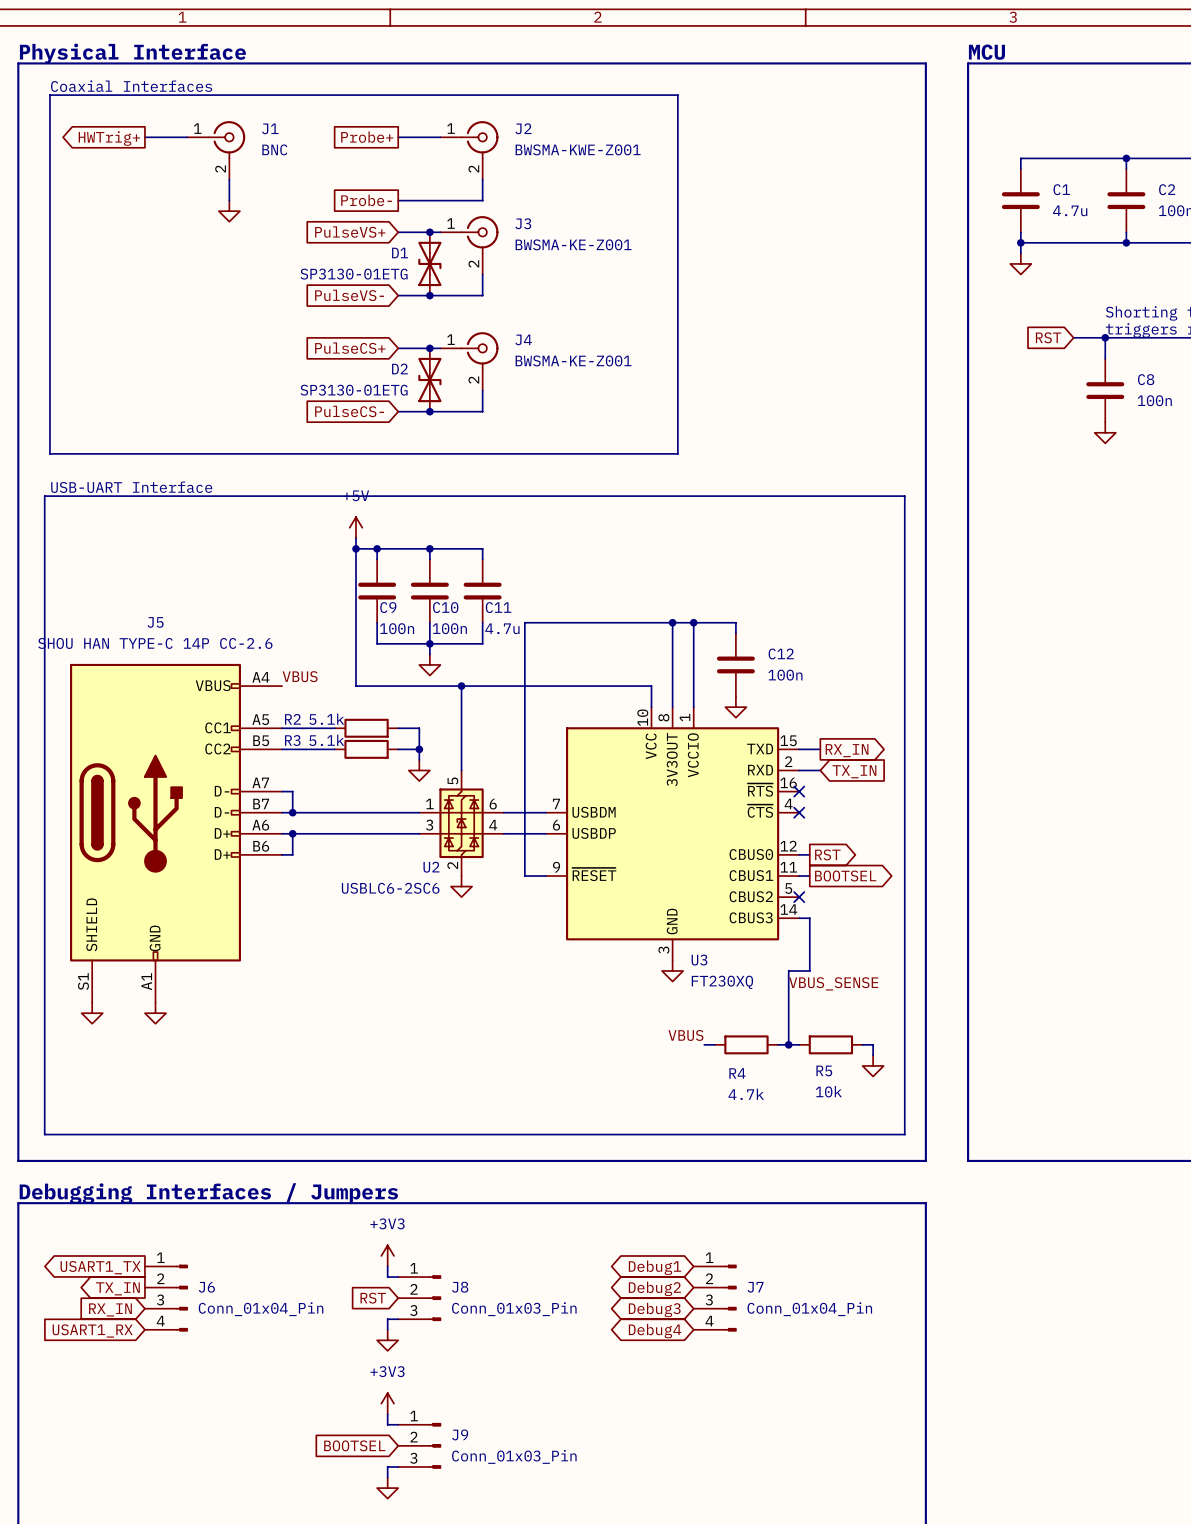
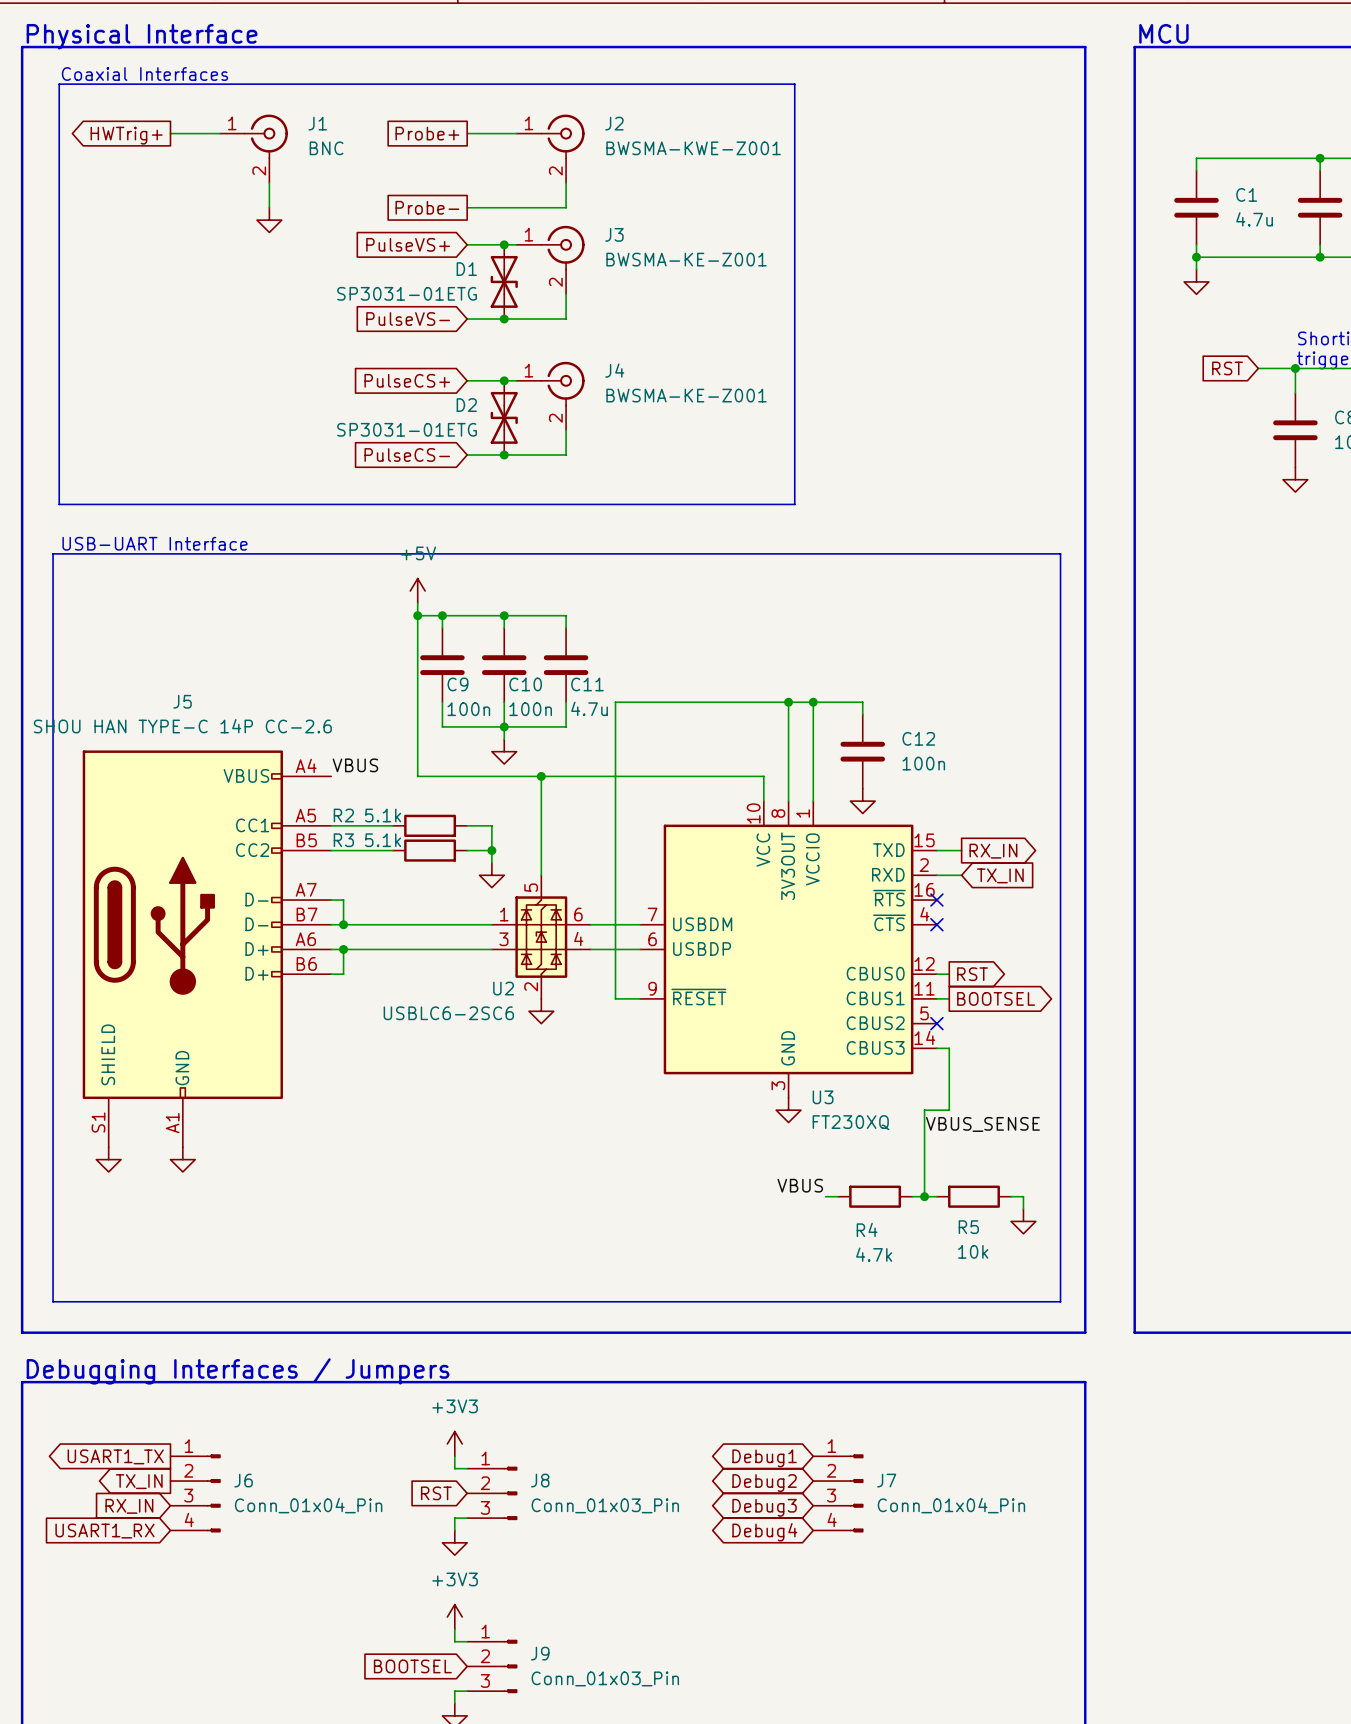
D1 value: SP3130-01ETG (354, 274) -> SP3031-01ETG (407, 293)
D2 value: SP3130-01ETG (354, 390) -> SP3031-01ETG (407, 429)

